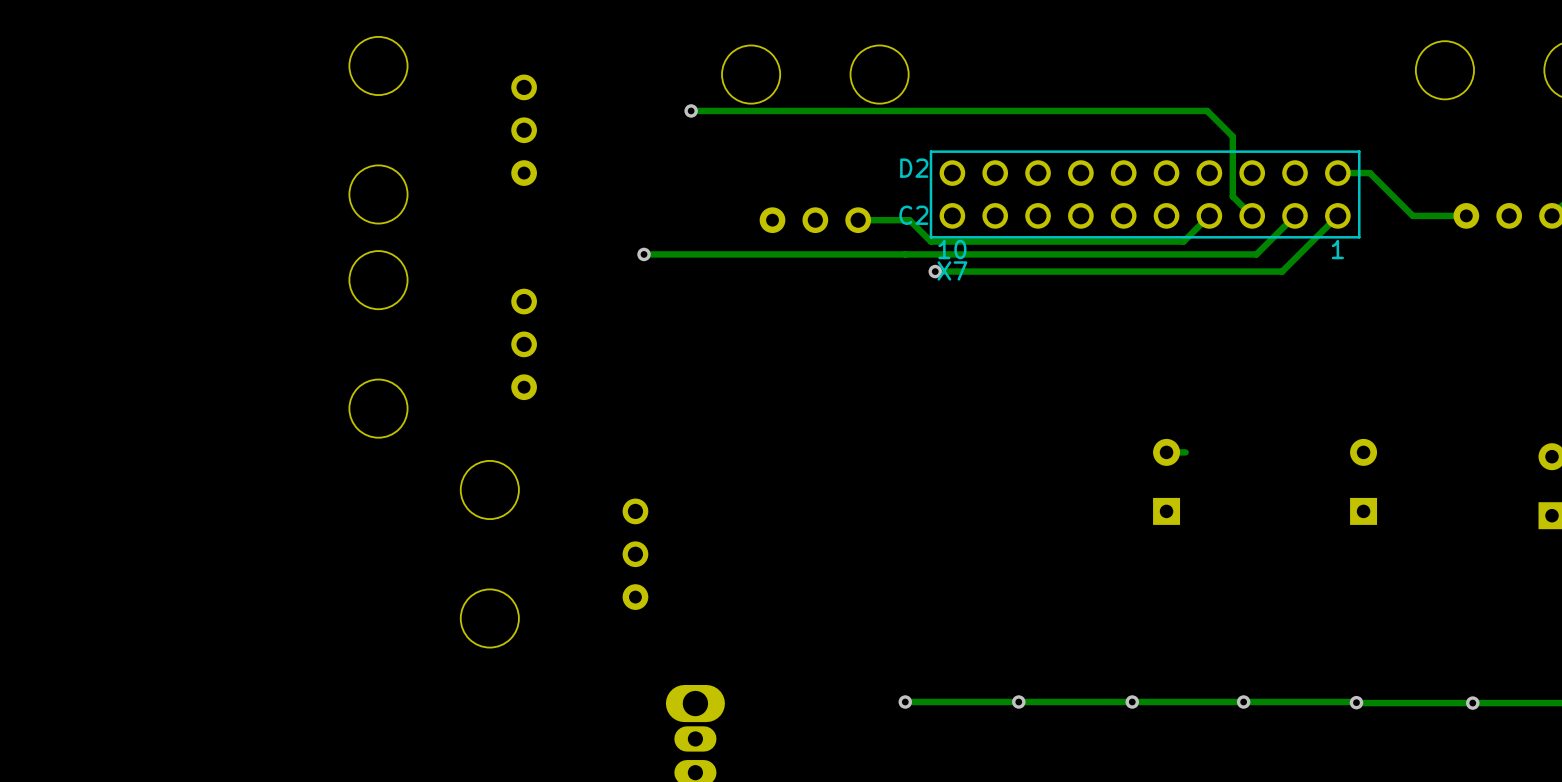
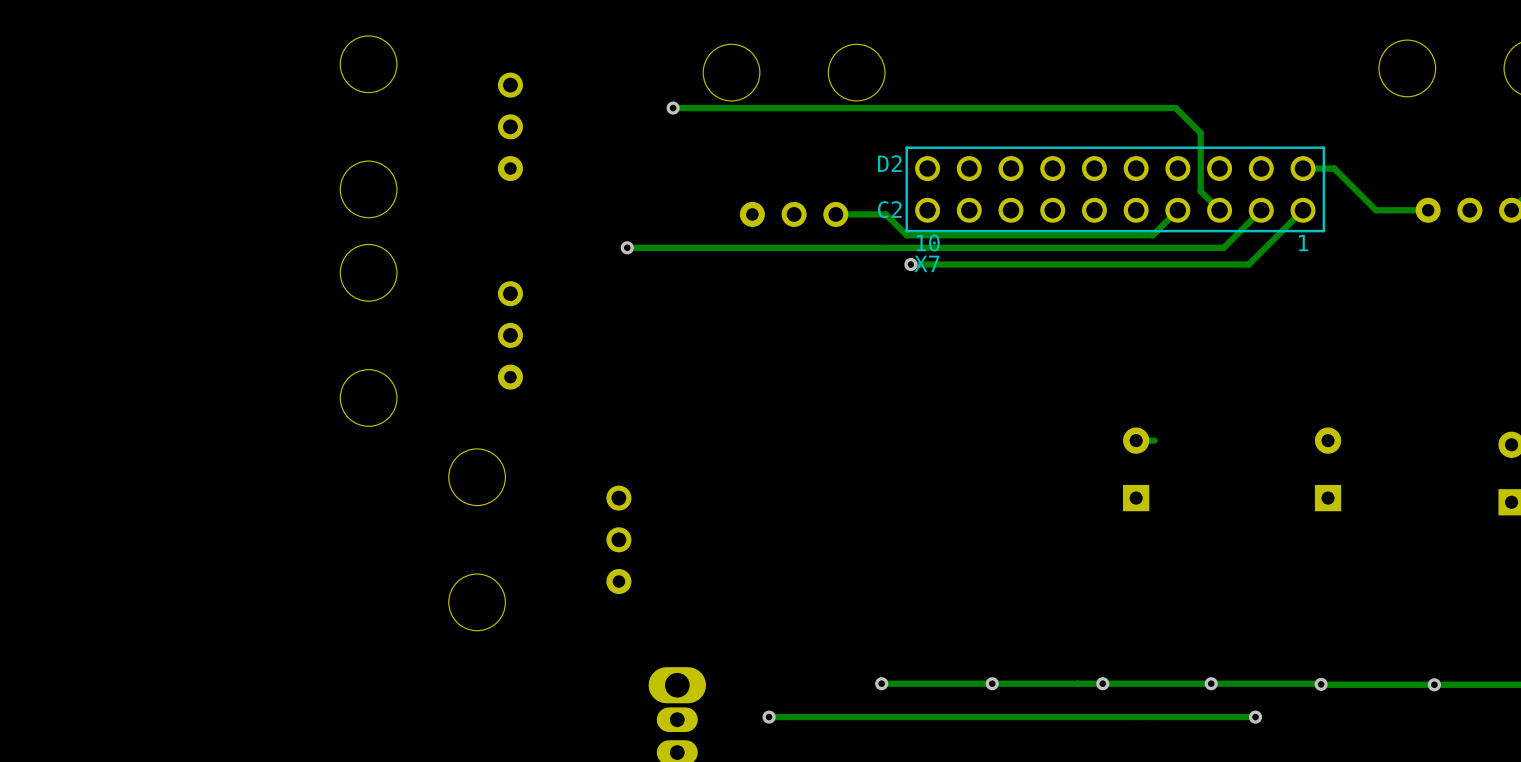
via: none -> (769, 717)
track: none -> (1255, 717) (769, 717)
via: none -> (1255, 717)

